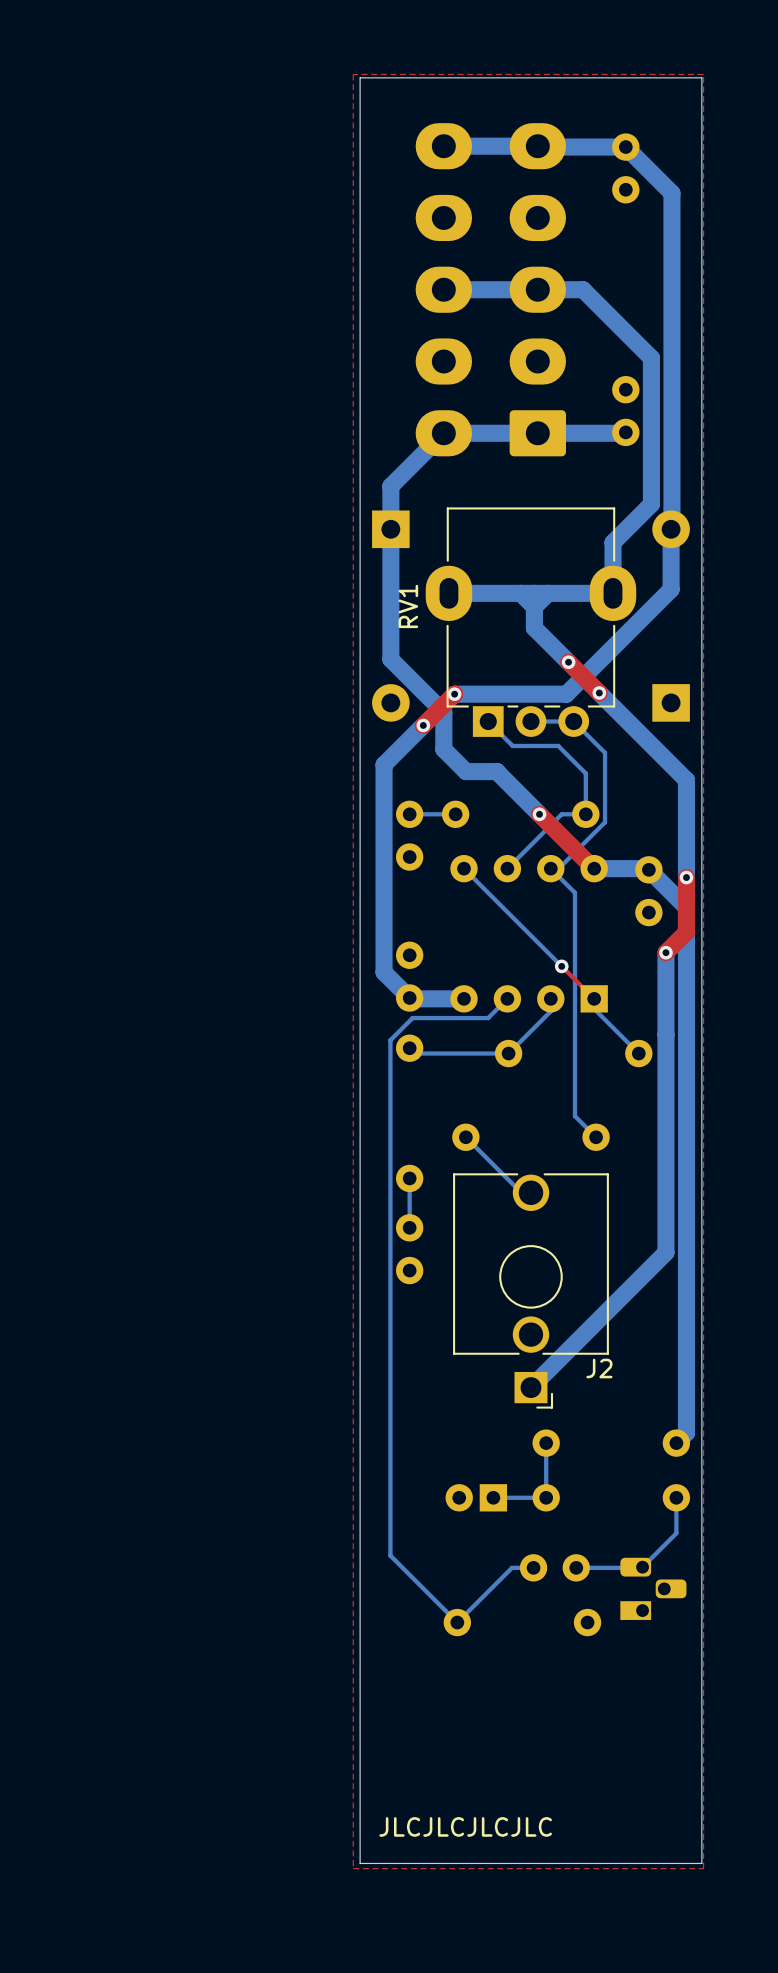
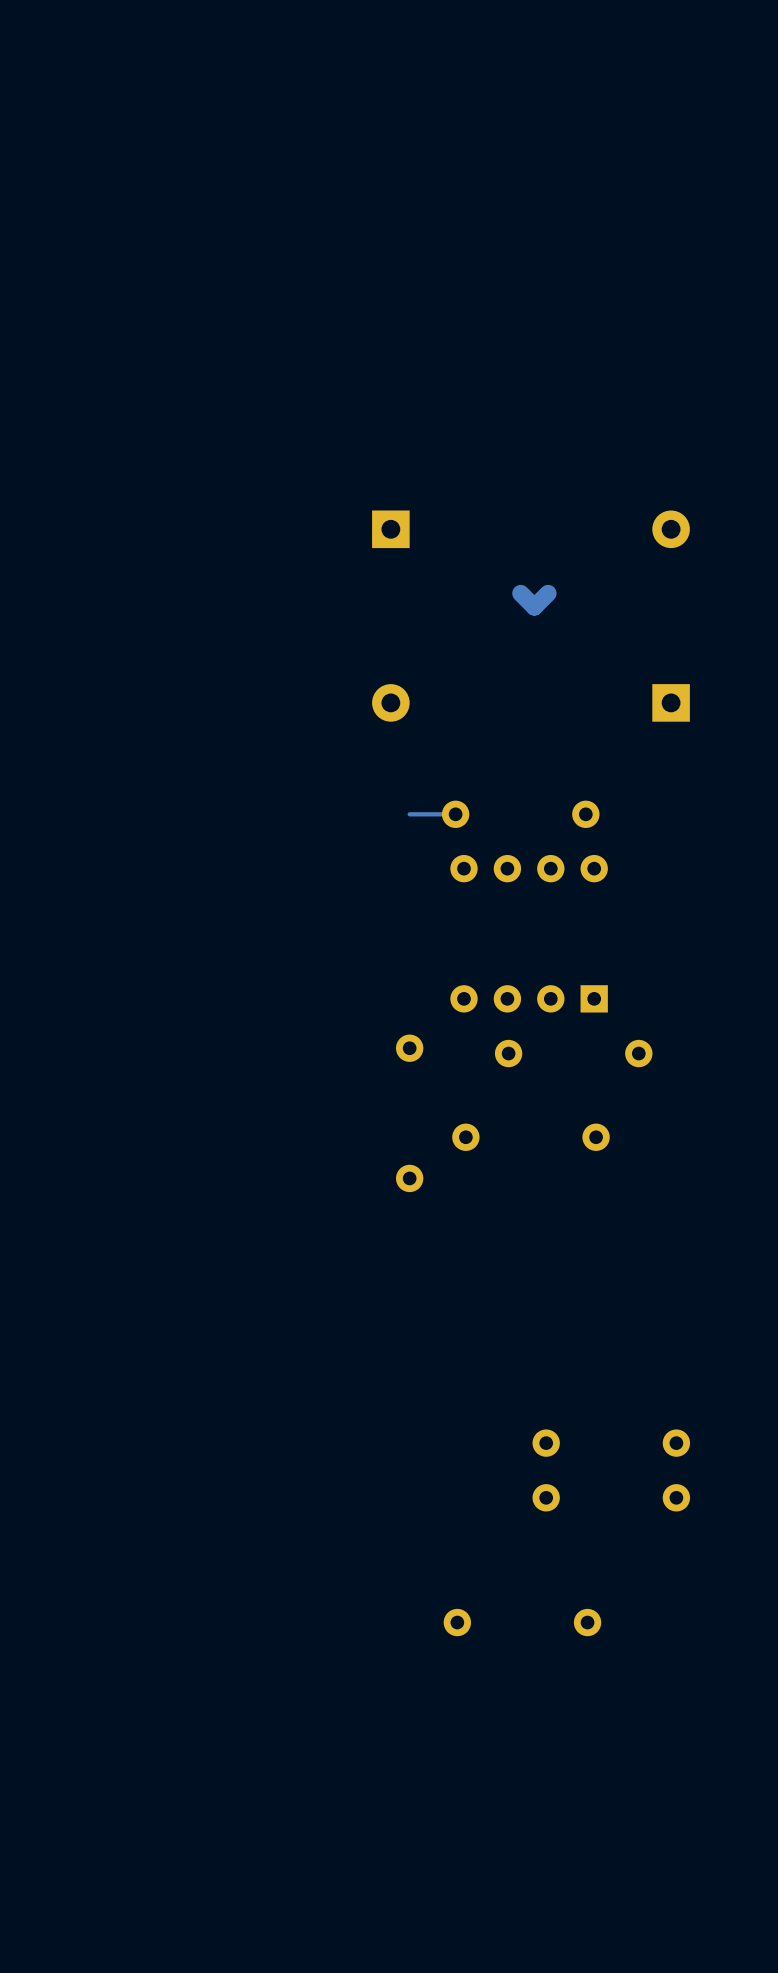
top zone outline: (353, 74) (703, 74) (703, 1868) (353, 1868) (353, 74) -> none
board edge: (360, 77) (701, 77) (701, 1863) (360, 1863) (360, 77) -> none
bottom track: (443, 146) (625, 147) (671, 193) (671, 589) (566, 694) (454, 694) -> none
part: (625, 168) -> none
bottom track: (443, 289) (583, 289) (651, 358) (651, 504) (613, 542) (613, 593) (448, 593) -> none
part: (490, 289) -> none
part: (625, 411) -> none
bottom track: (625, 432) (443, 433) (390, 486) (390, 659) (443, 712) (443, 749) (466, 771) (497, 771) -> none
bottom track: (534, 593) (534, 628) (568, 662) -> none
RV1: (530, 622) -> none
top track: (568, 662) (599, 692) -> none
via: (568, 662) -> none
bottom track: (599, 692) (686, 780) (686, 877) -> none
via: (599, 692) -> none
top track: (454, 694) (423, 725) -> none
via: (454, 694) -> none
bottom track: (493, 721) (488, 721) (512, 745) (558, 745) (585, 773) (585, 814) (561, 814) (507, 868) -> none
bottom track: (530, 721) (573, 721) (605, 752) (605, 822) (558, 868) (550, 868) (574, 892) (574, 1116) (596, 1137) -> none
bottom track: (423, 725) (384, 764) (384, 972) (410, 998) (464, 998) -> none
via: (423, 725) -> none
bottom track: (497, 771) (539, 814) -> none
top track: (539, 814) (593, 868) -> none
via: (539, 814) -> none
part: (409, 835) -> none
bottom track: (464, 868) (561, 966) -> none
bottom track: (594, 868) (647, 868) (686, 907) (686, 1433) (676, 1443) -> none
top track: (686, 877) (686, 932) (665, 952) -> none
via: (686, 877) -> none
part: (648, 891) -> none
bottom track: (665, 952) (665, 1252) (530, 1387) -> none
via: (665, 952) -> none
top track: (561, 966) (594, 998) -> none
via: (561, 966) -> none
part: (409, 976) -> none
bottom track: (507, 998) (488, 1018) (412, 1018) (390, 1040) (390, 1555) (457, 1622) (512, 1567) (533, 1567) -> none
bottom track: (550, 998) (550, 1011) (508, 1053) (414, 1053) (409, 1048) -> none
bottom track: (594, 998) (594, 1008) (638, 1053) -> none
bottom track: (465, 1137) (521, 1192) (530, 1192) -> none
bottom track: (409, 1178) (409, 1227) -> none
part: (409, 1249) -> none
J2: (530, 1290) -> none
bottom track: (546, 1443) (546, 1497) (493, 1497) -> none
part: (476, 1497) -> none
bottom track: (676, 1497) (676, 1533) (641, 1567) (576, 1567) -> none
part: (554, 1567) -> none
part: (653, 1588) -> none
text: JLCJLCJLCJLC (465, 1826) -> none

